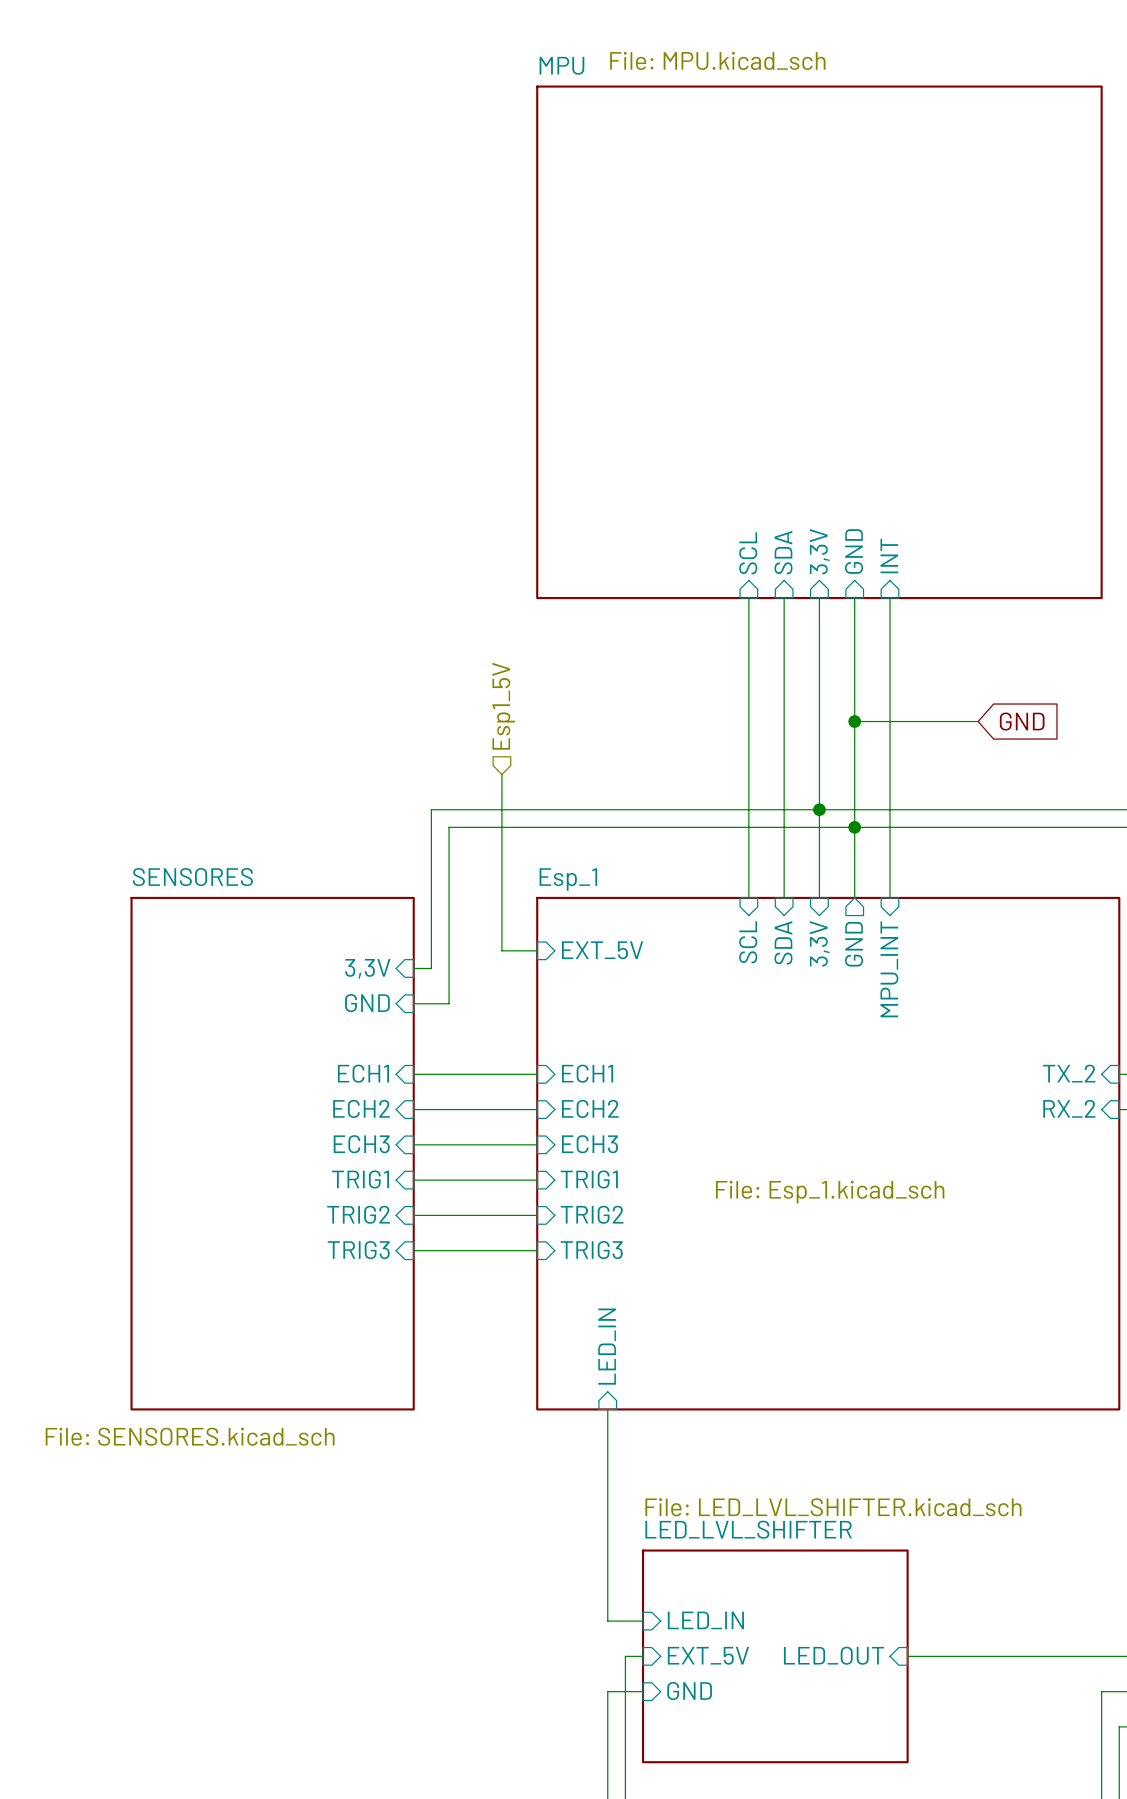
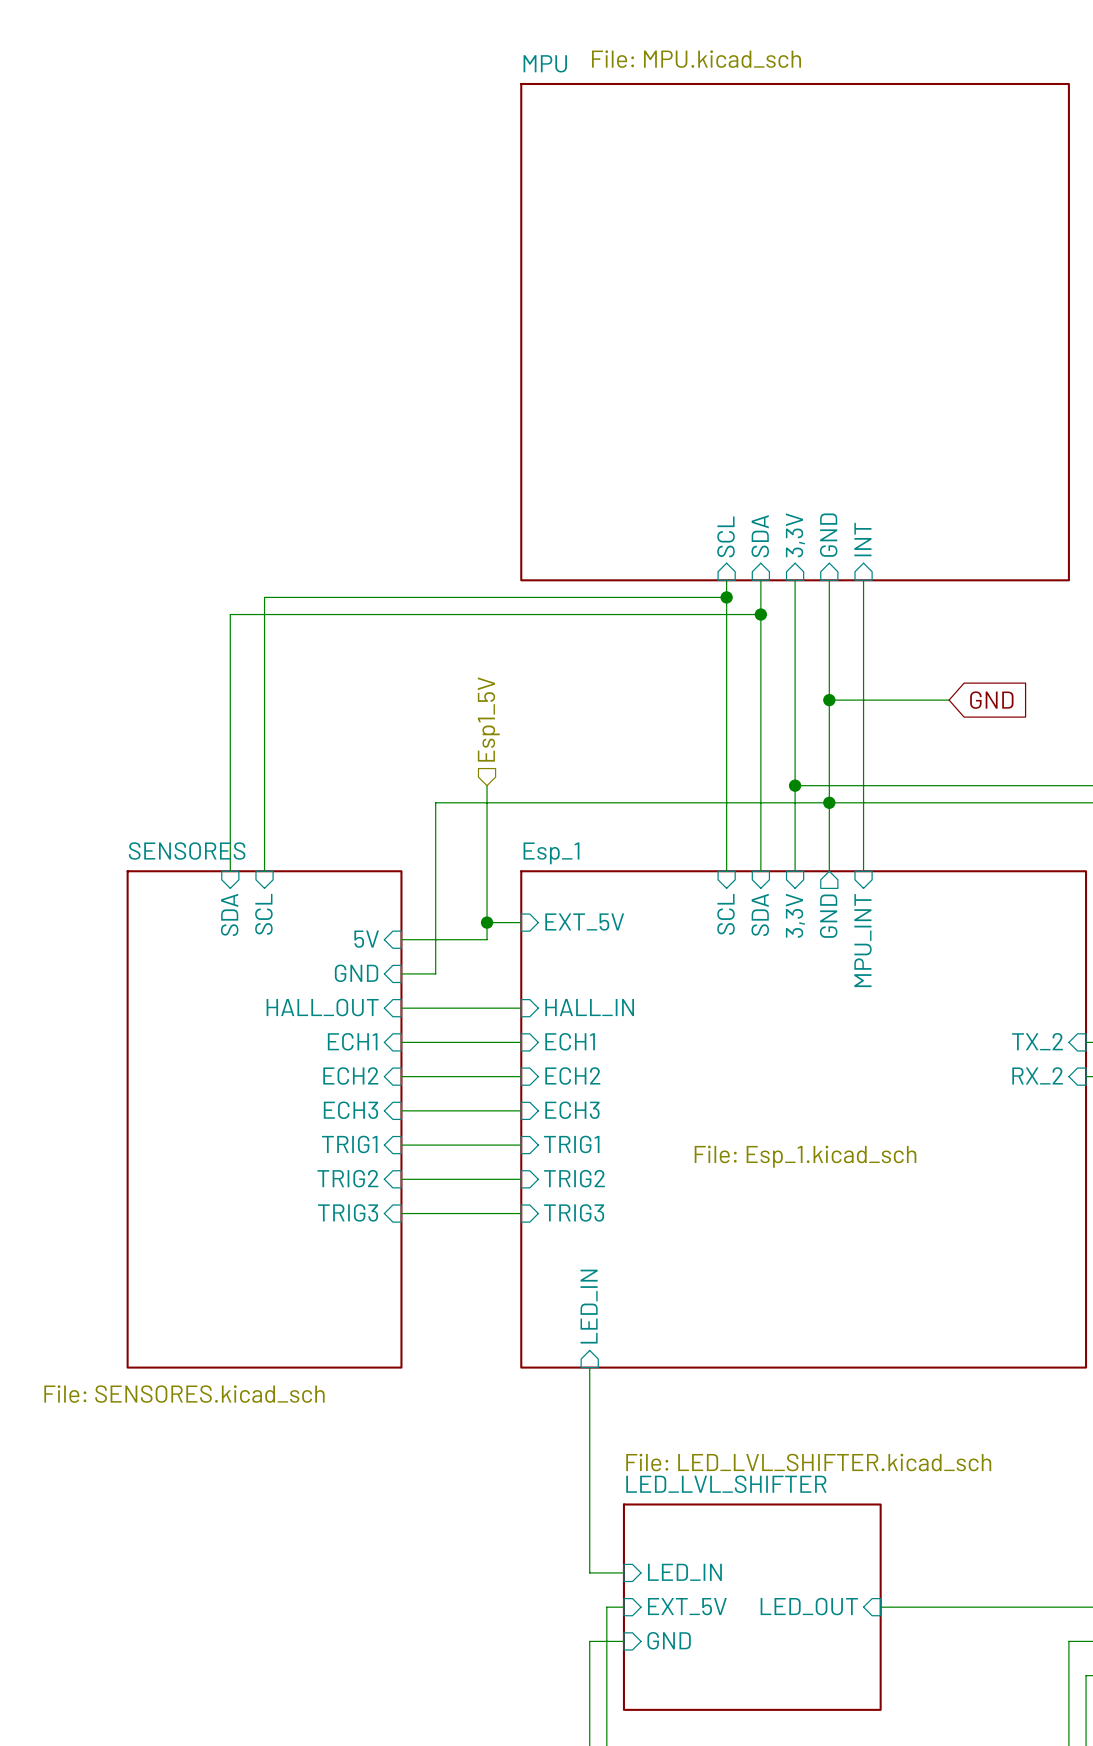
wire: none -> (726, 597) (264, 597) (264, 871)
junction: none -> (726, 597)
wire: none -> (760, 614) (230, 614) (230, 871)
junction: none -> (760, 614)
hierarchical label position: Esp1_5V (503, 706) -> Esp1_5V (488, 719)
wire: (501, 774) (501, 809) -> none
wire: (819, 809) (431, 809) (431, 968) -> (487, 922) (487, 939) (418, 939)
sheet pin: none -> SDA (229, 914)
sheet pin: none -> SCL (263, 914)
junction: none -> (487, 922)
sheet pin: 3,3V (367, 968) -> 5V (366, 939)
sheet pin: none -> HALL_OUT (322, 1007)
sheet pin: none -> HALL_IN (589, 1007)
wire: none -> (401, 1008) (521, 1008)

